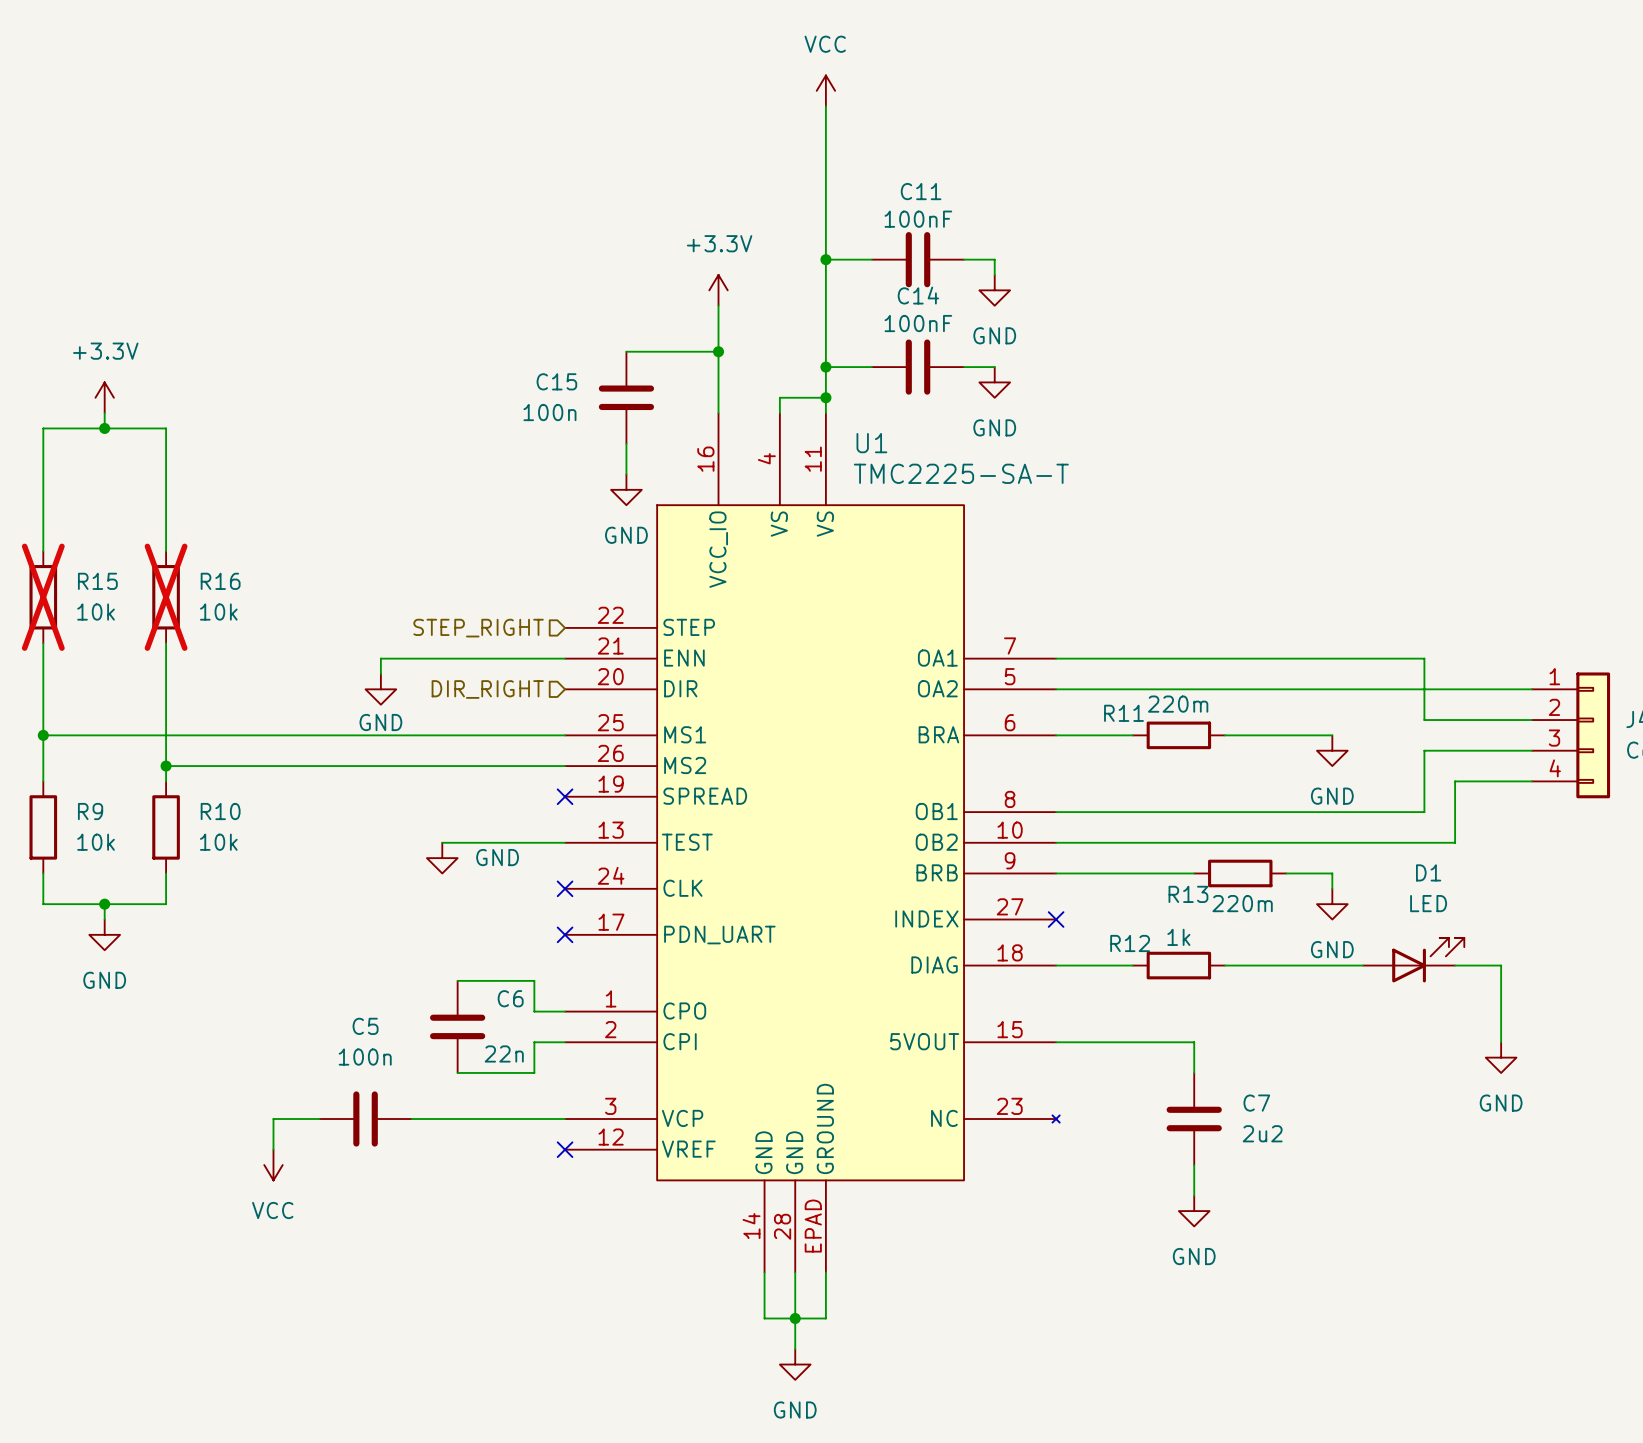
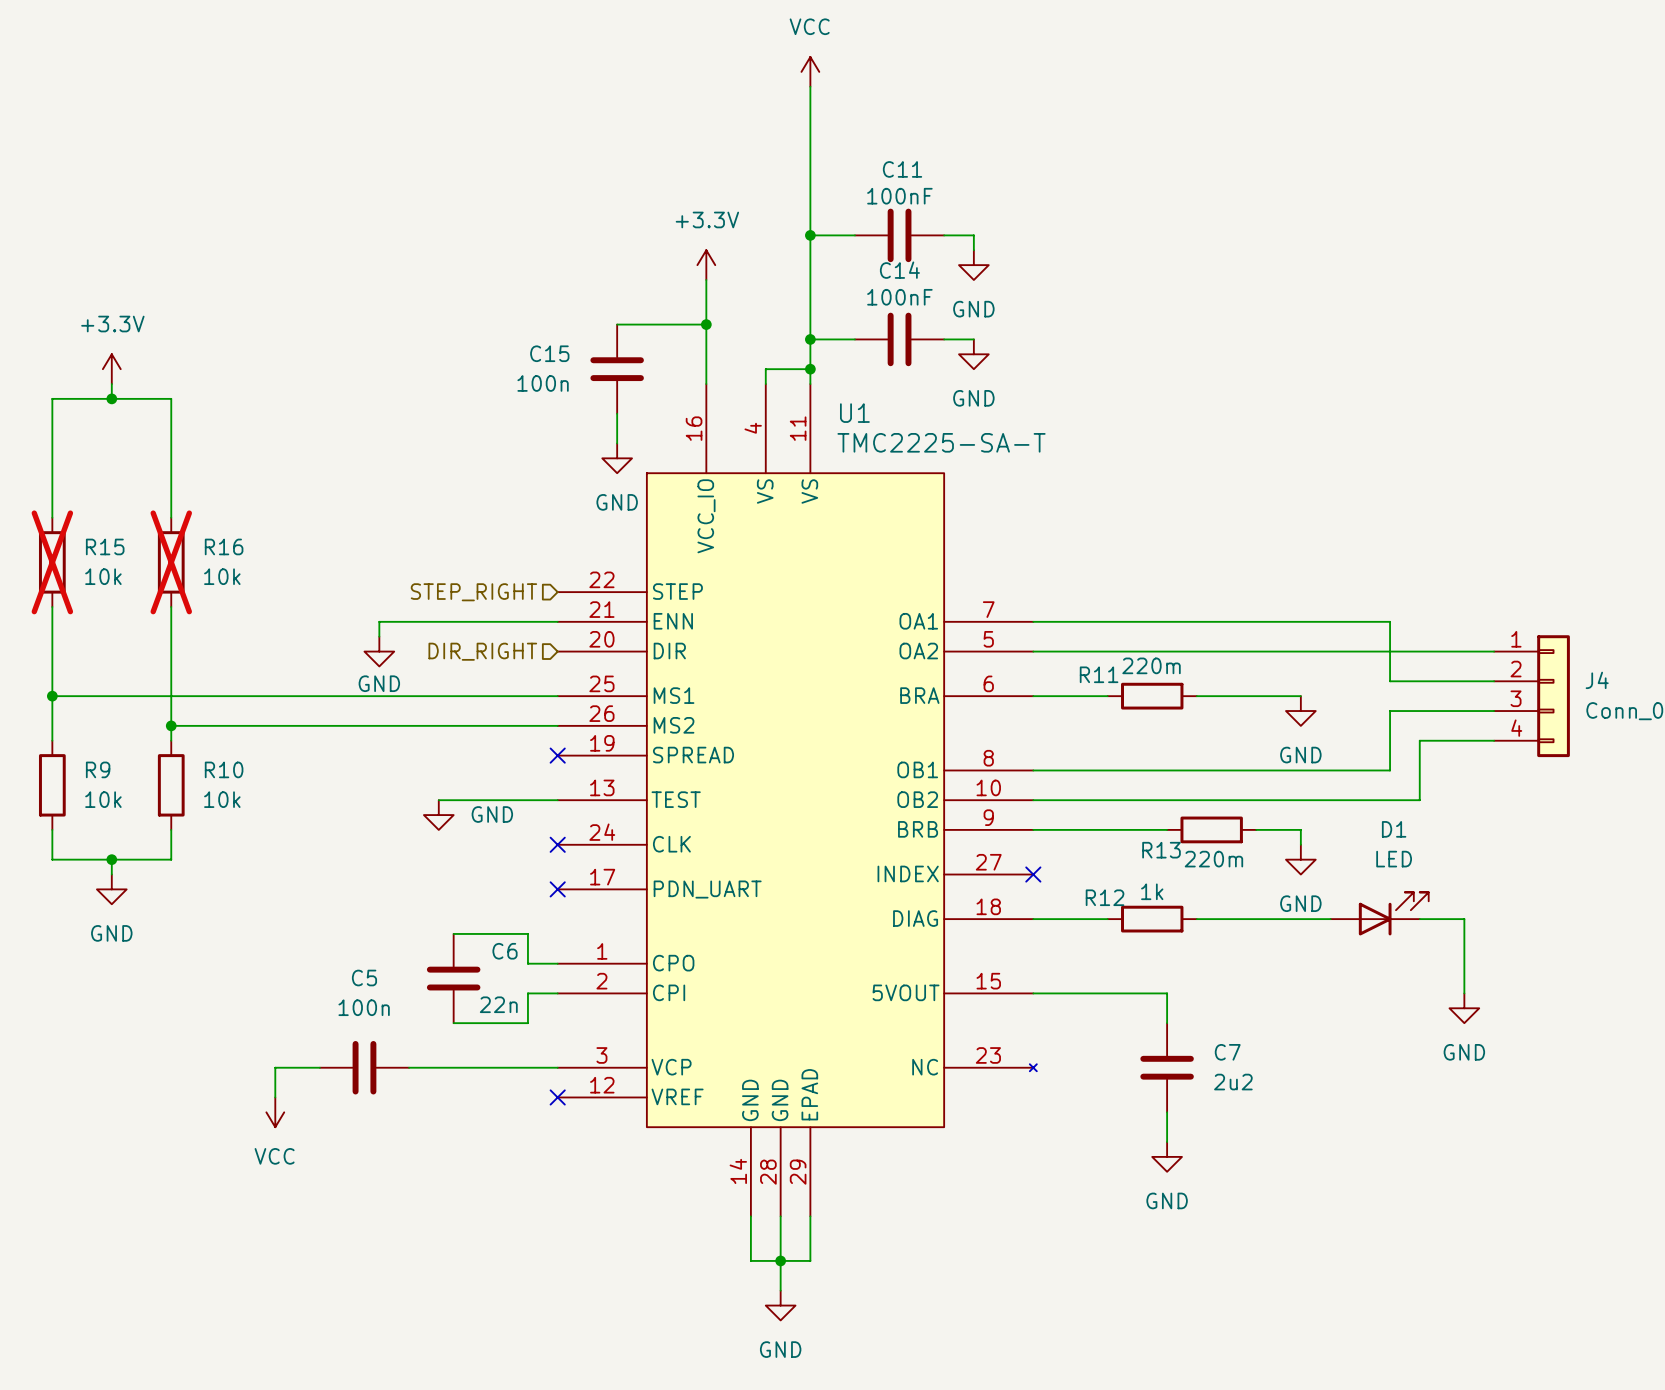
U1 pin name: GROUND (825, 1128) -> EPAD (809, 1094)
U1 pin number: EPAD (813, 1226) -> 29 (798, 1172)

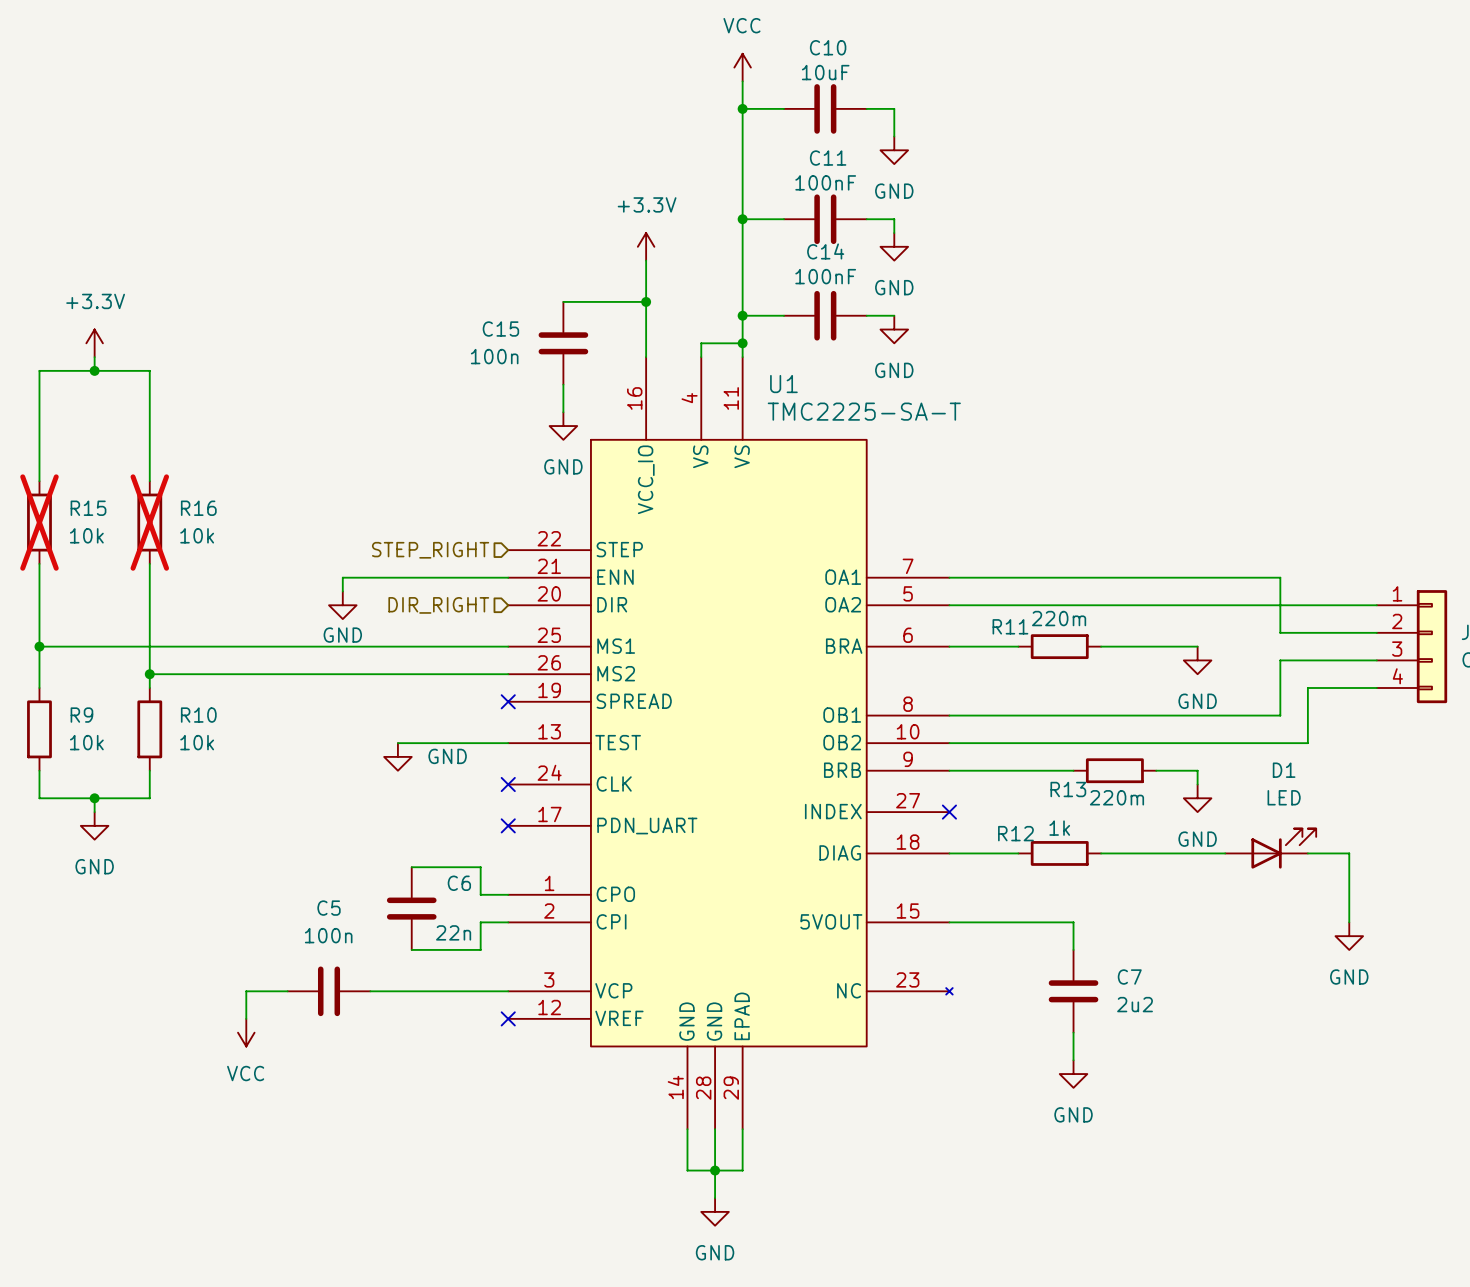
wire: none -> (742, 108) (783, 108)
junction: none -> (742, 108)
C10: none -> 10uF (825, 108)
wire: none -> (866, 108) (894, 108) (894, 136)
power symbol: none -> GND (894, 150)

